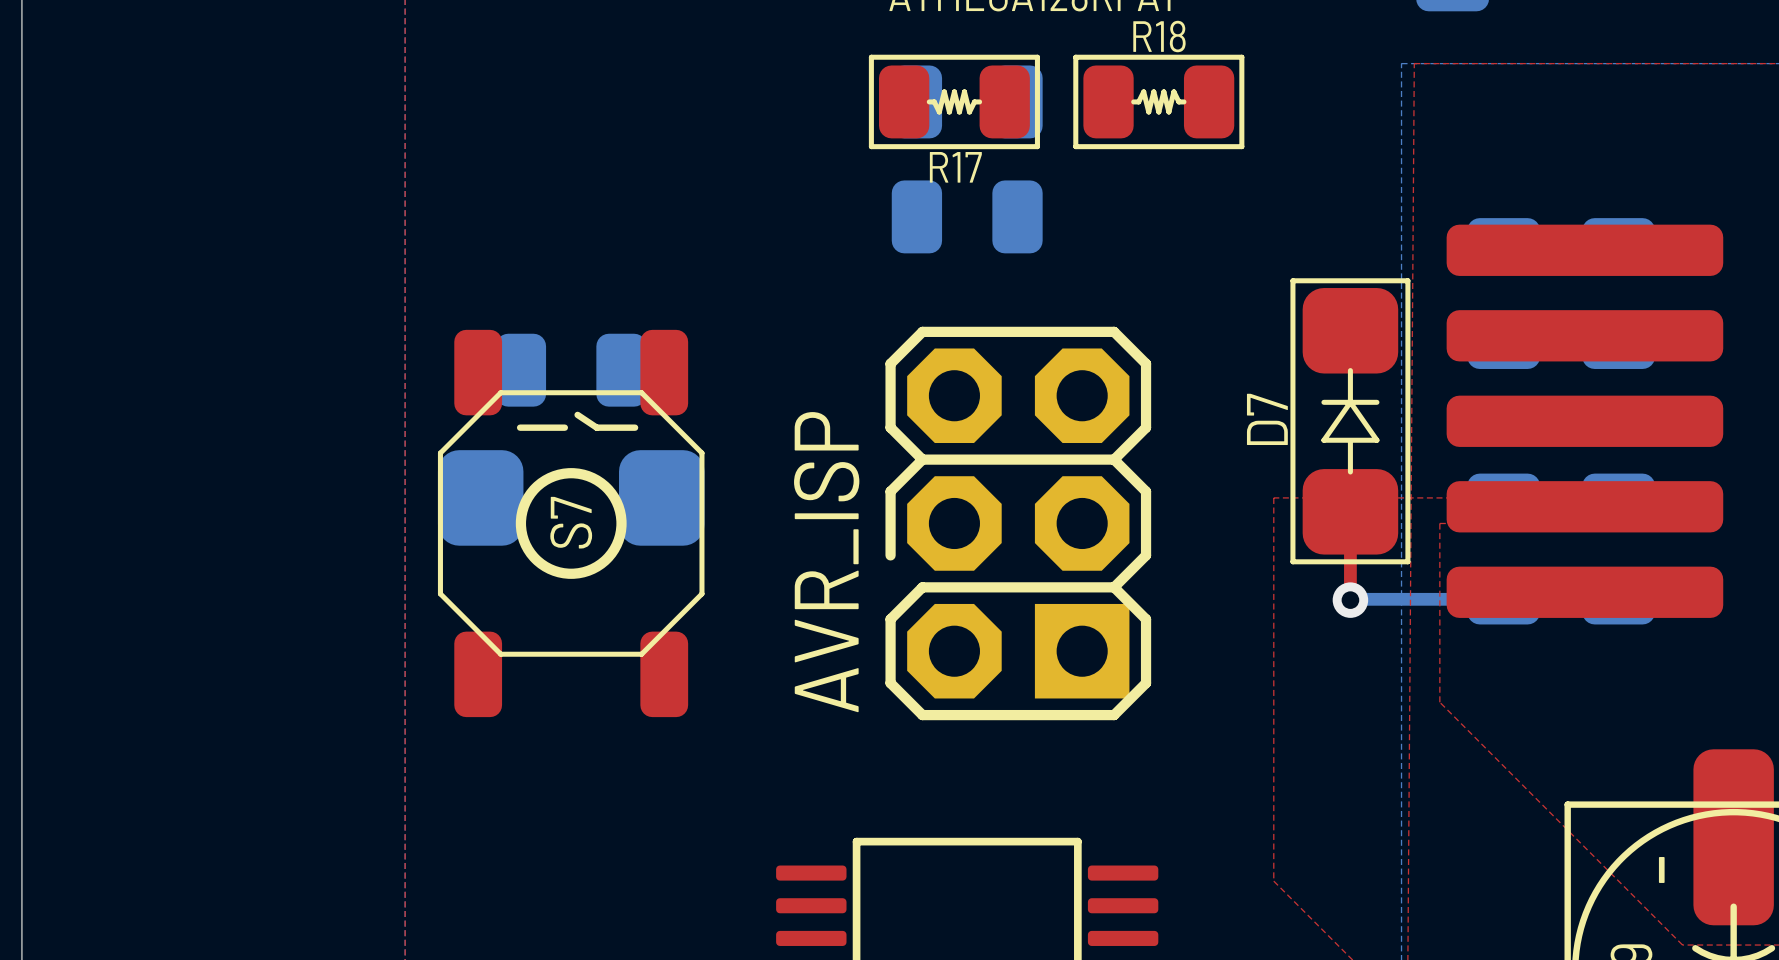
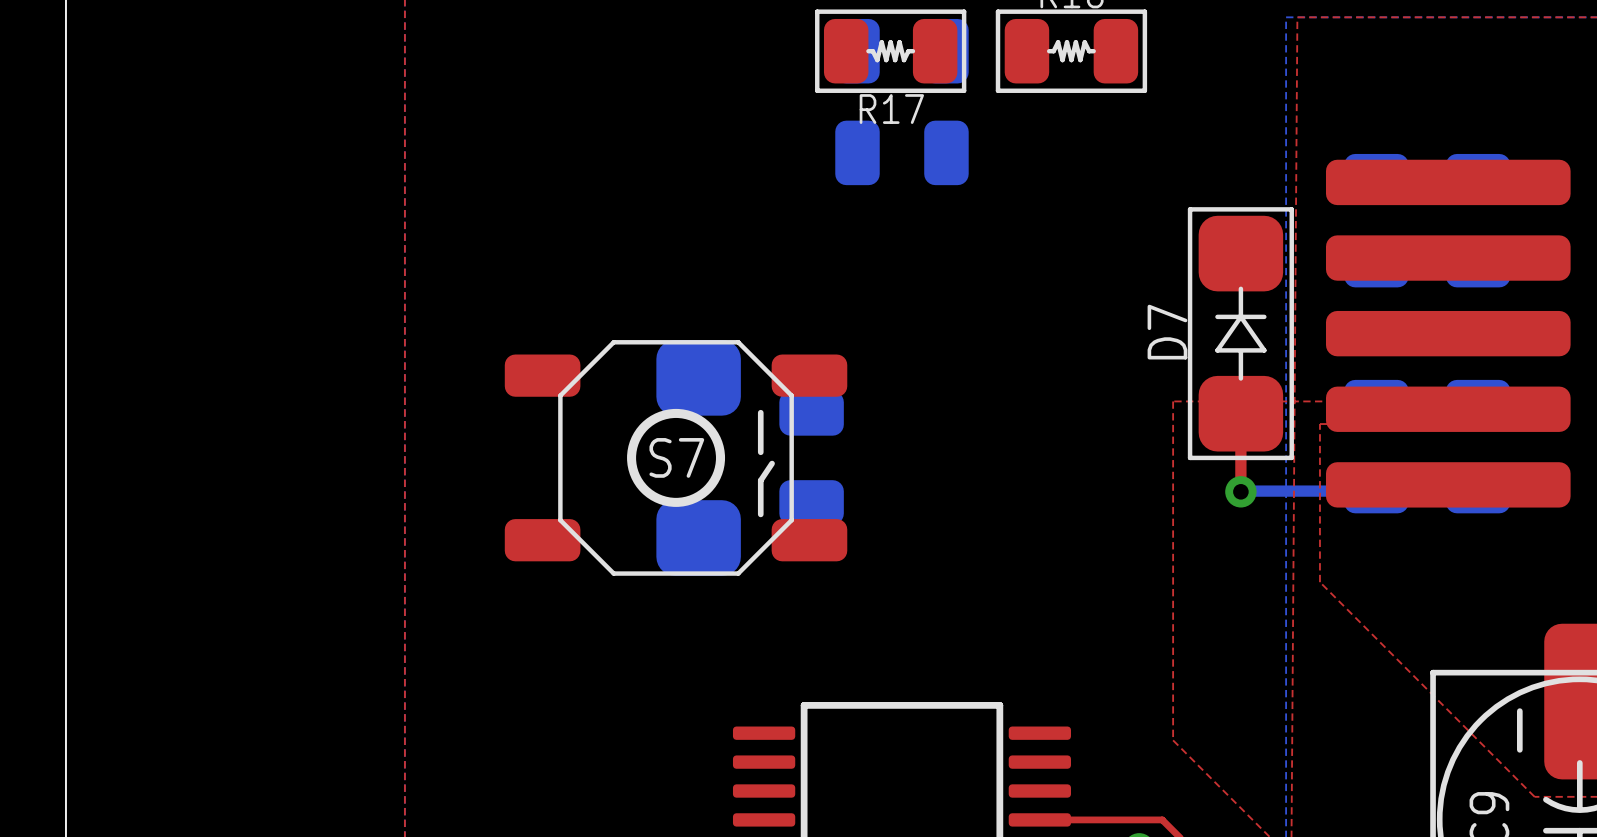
part rotation: 0° (571, 370) -> 90° clockwise (811, 457)
part position: (571, 370) -> (811, 457)
part rotation: 0° (571, 497) -> 90° clockwise (698, 457)
part position: (571, 497) -> (698, 457)
S7 rotation: 0° (571, 523) -> 90° clockwise (676, 457)
AVR_ISP: (1018, 523) -> none

